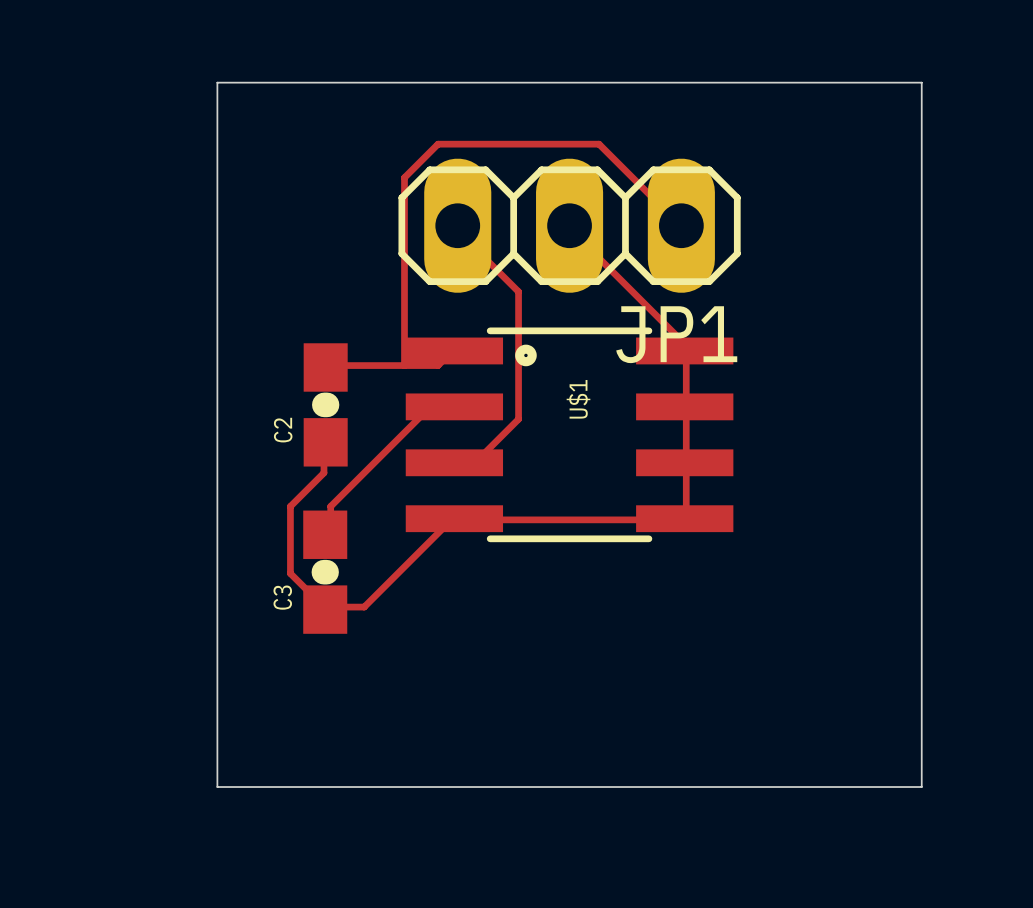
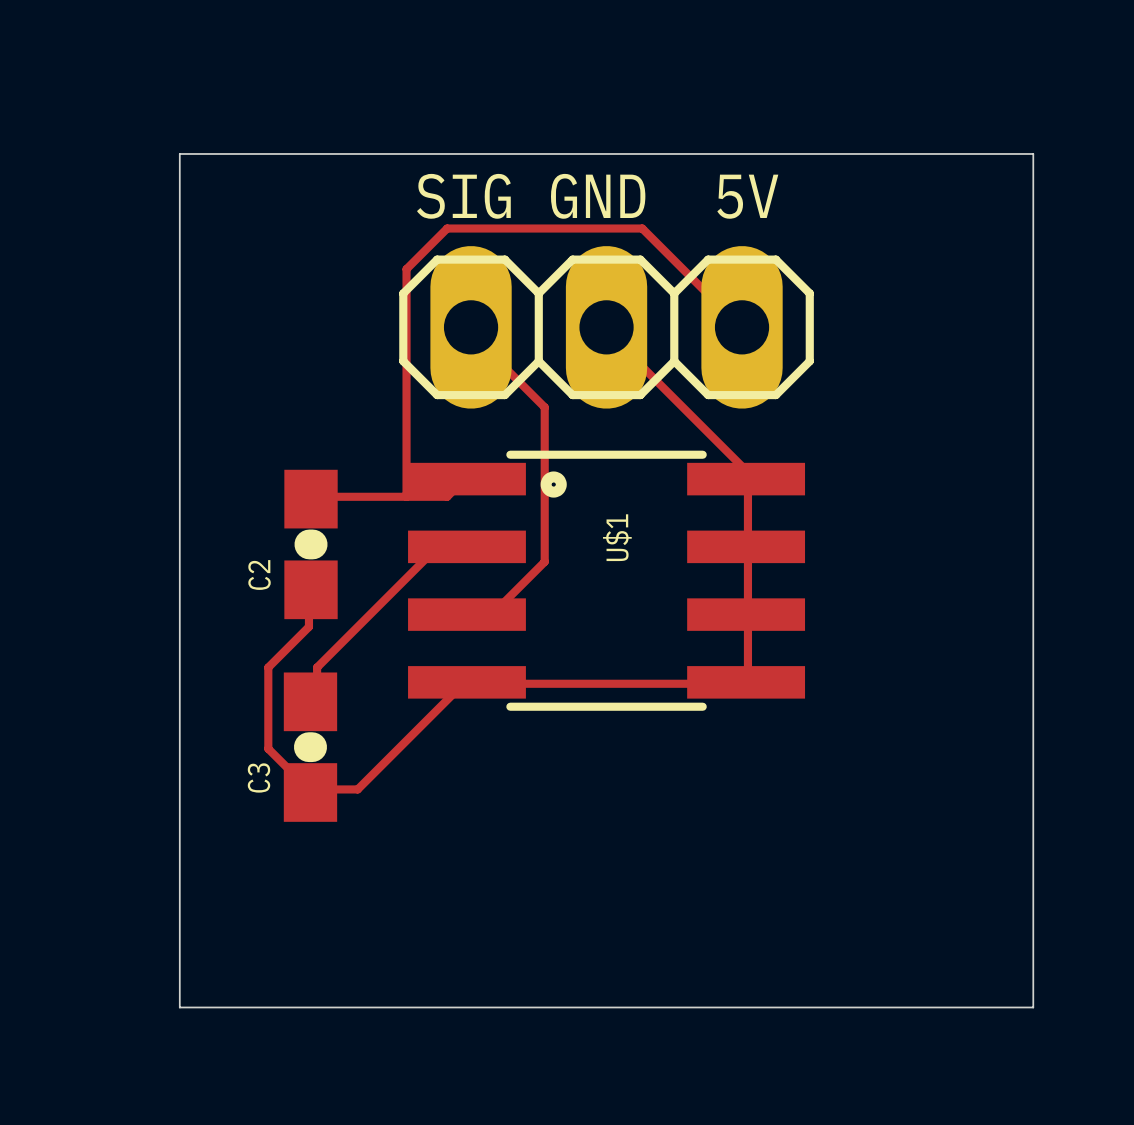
text: none -> SIG (463, 196)
text: none -> GND (598, 196)
text: none -> 5V (747, 196)
JP1 name: JP1 (676, 334) -> none

